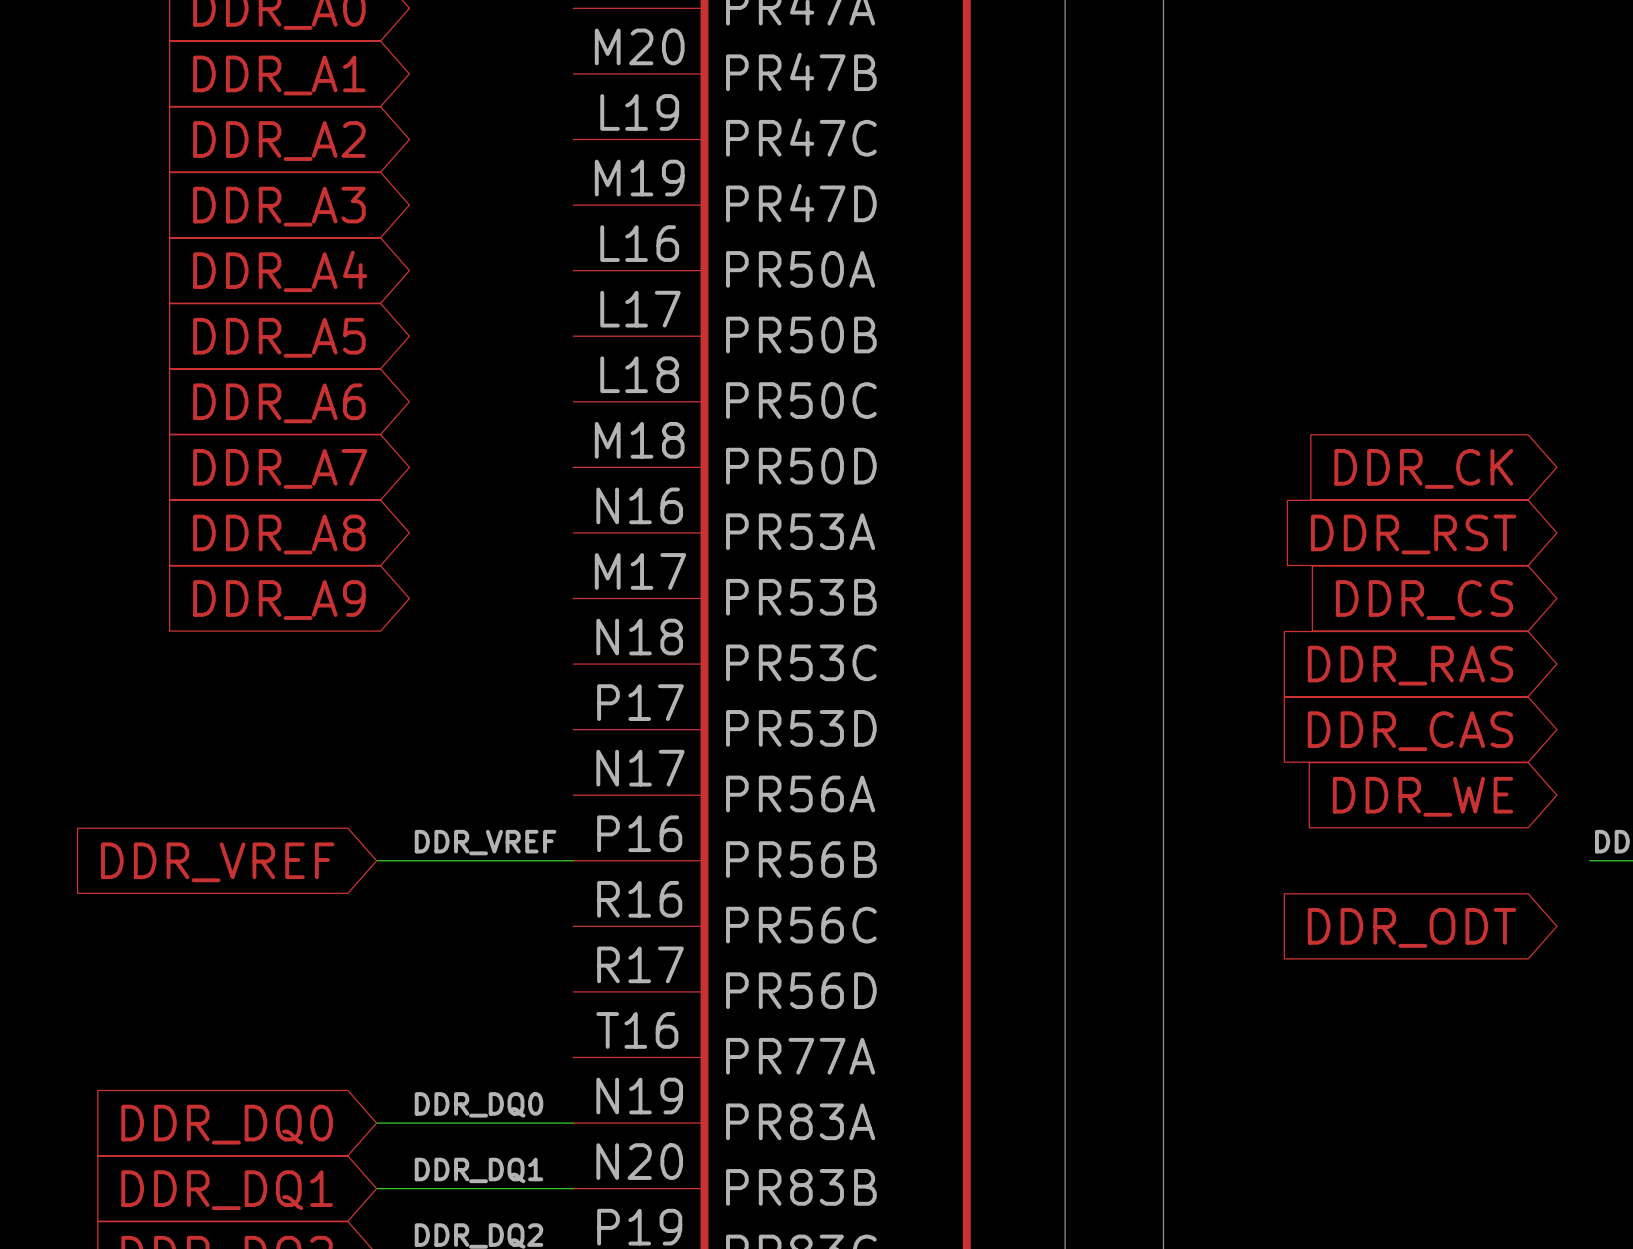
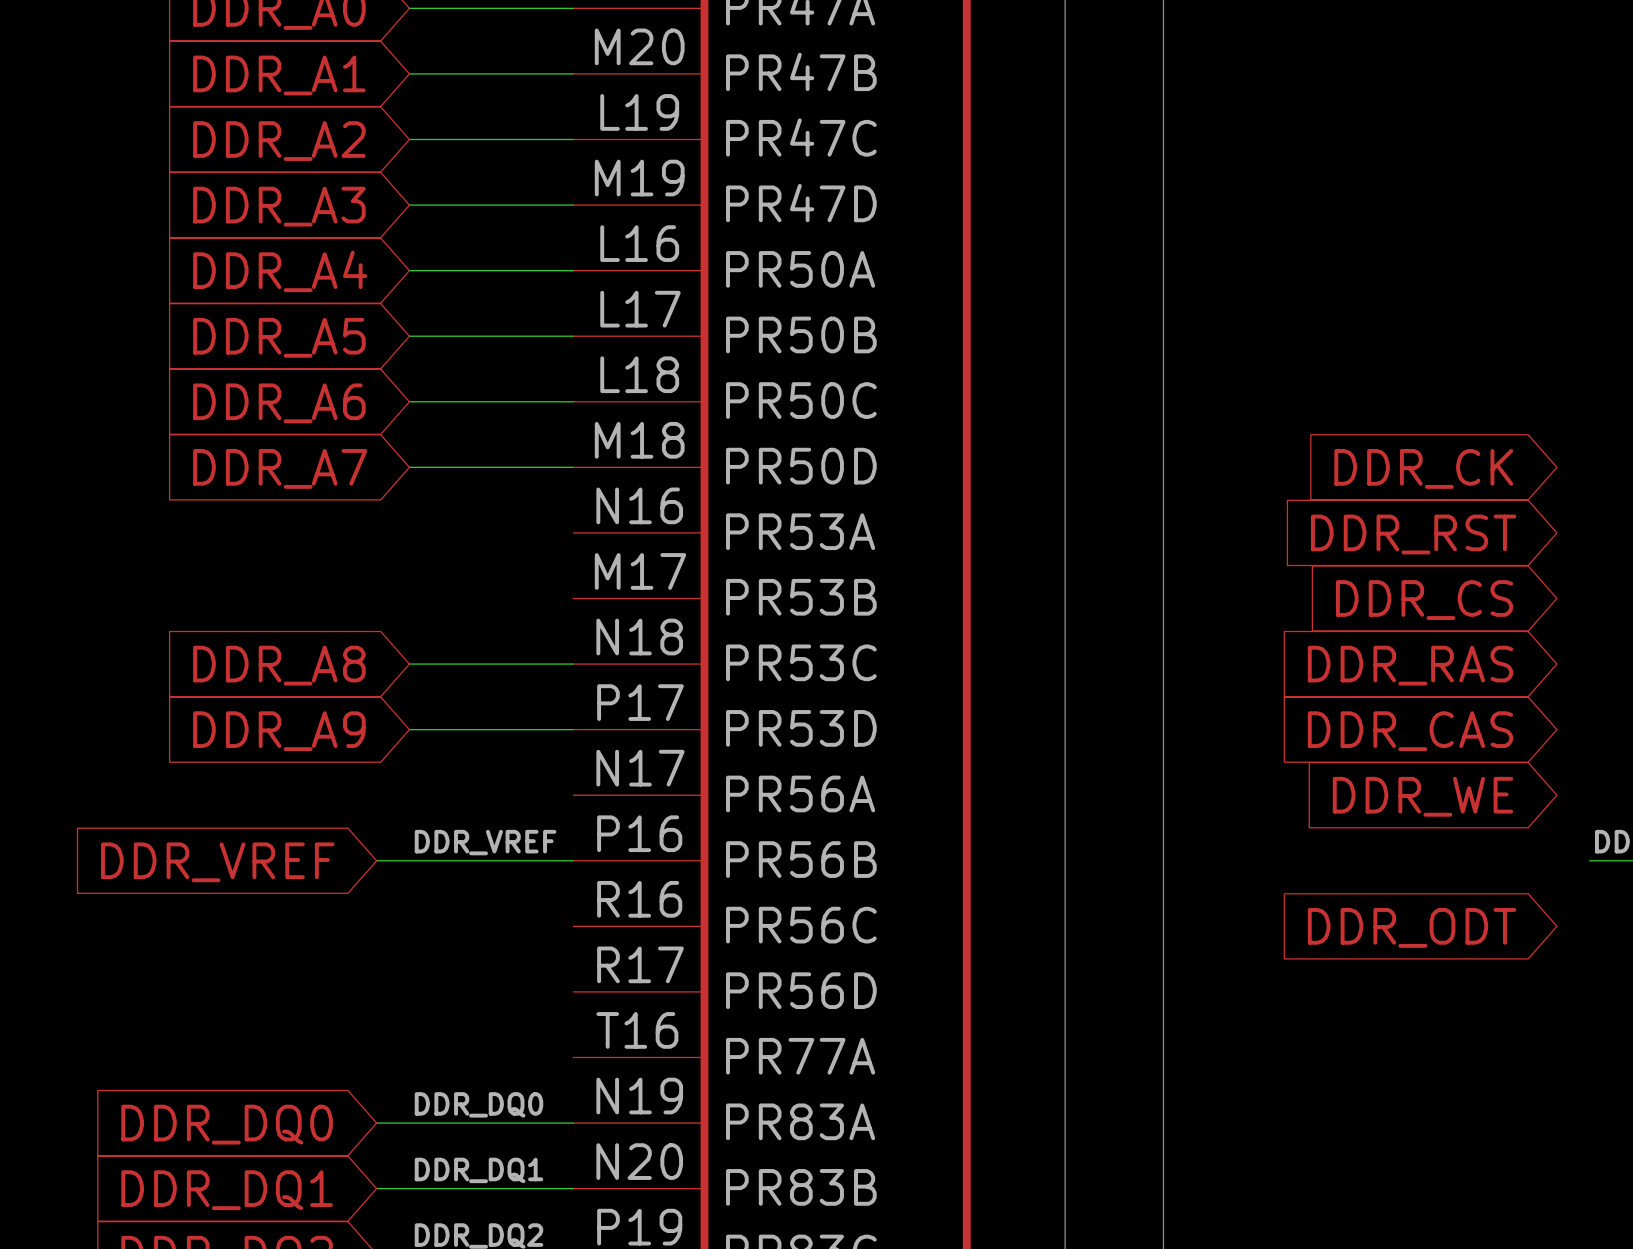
wire: none -> (409, 8) (573, 8)
wire: none -> (409, 73) (573, 73)
wire: none -> (409, 139) (573, 139)
wire: none -> (409, 205) (573, 205)
wire: none -> (409, 270) (573, 270)
wire: none -> (409, 336) (573, 336)
wire: none -> (409, 401) (573, 401)
wire: none -> (409, 467) (573, 467)
global label position: DDR_A8 (279, 534) -> DDR_A8 (279, 665)
global label position: DDR_A9 (279, 600) -> DDR_A9 (279, 731)
wire: none -> (409, 664) (573, 664)
wire: none -> (409, 729) (573, 729)

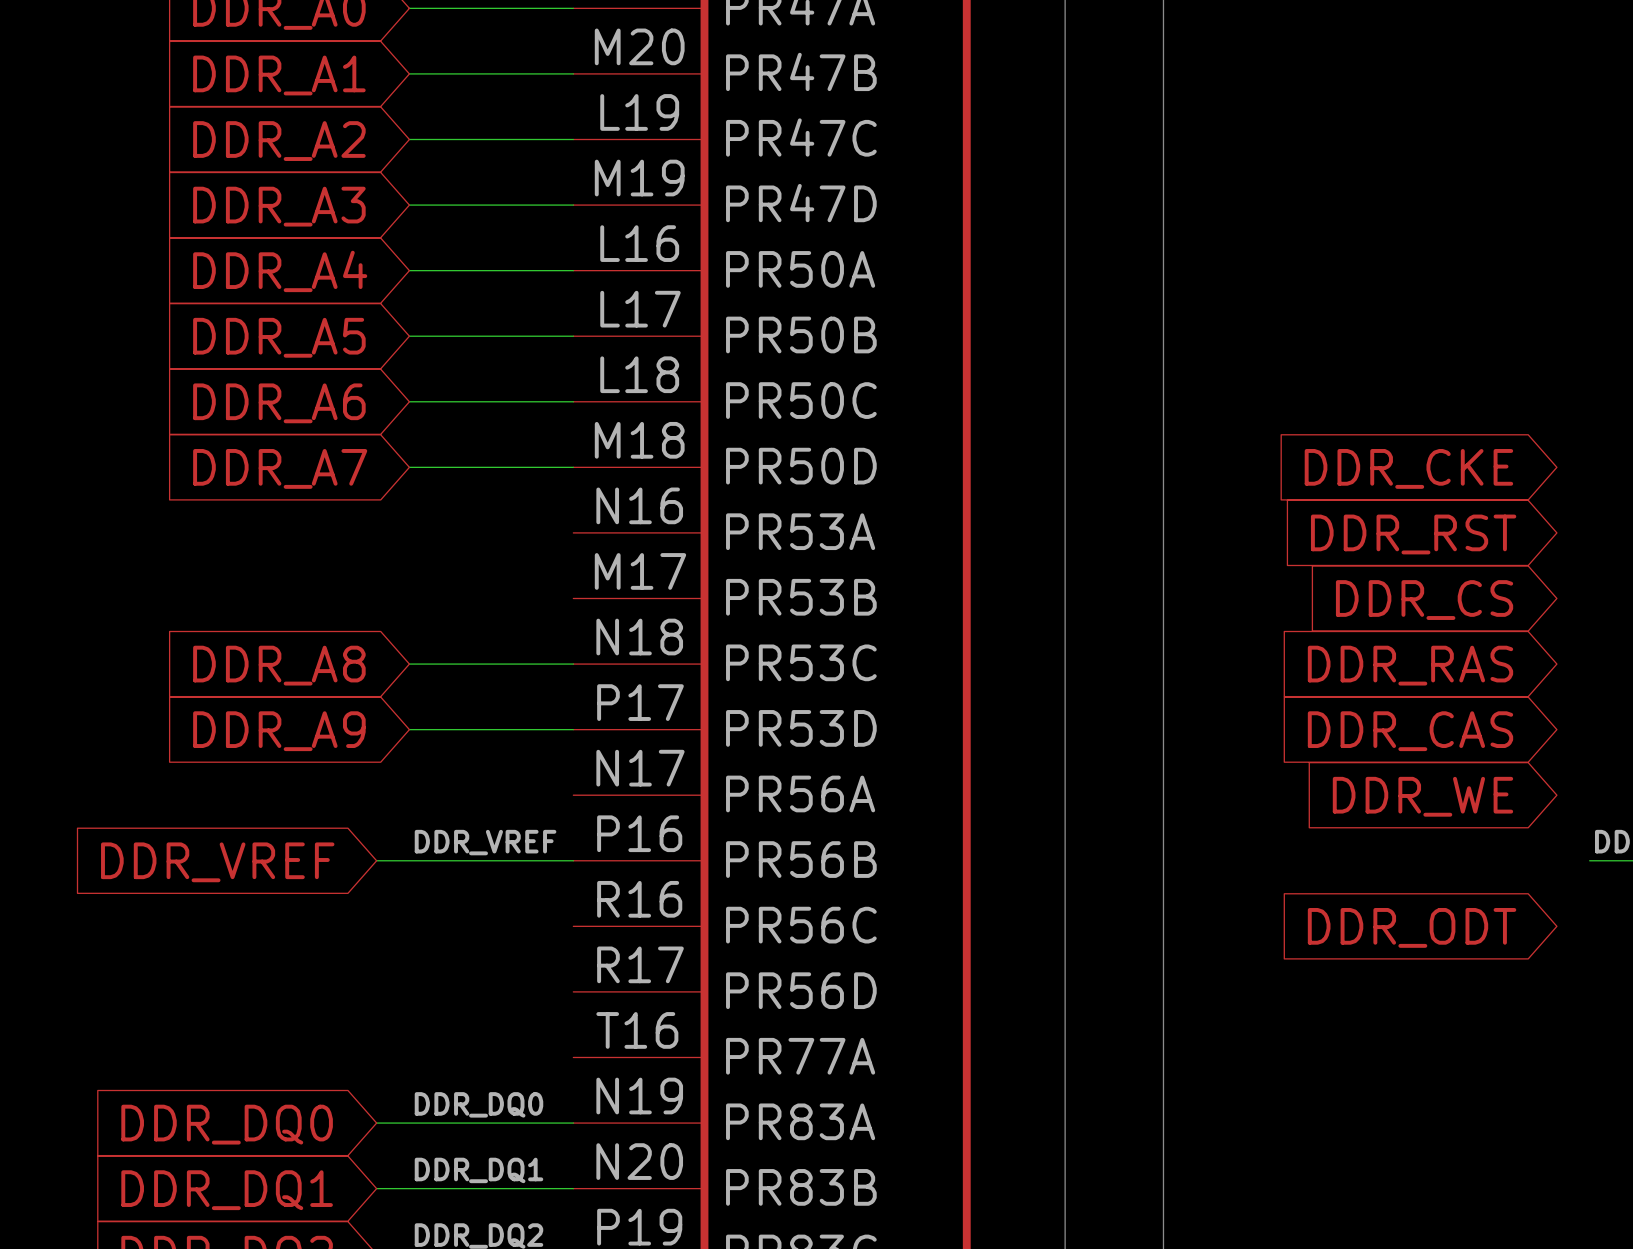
global label: DDR_CK (1423, 468) -> DDR_CKE (1408, 468)

